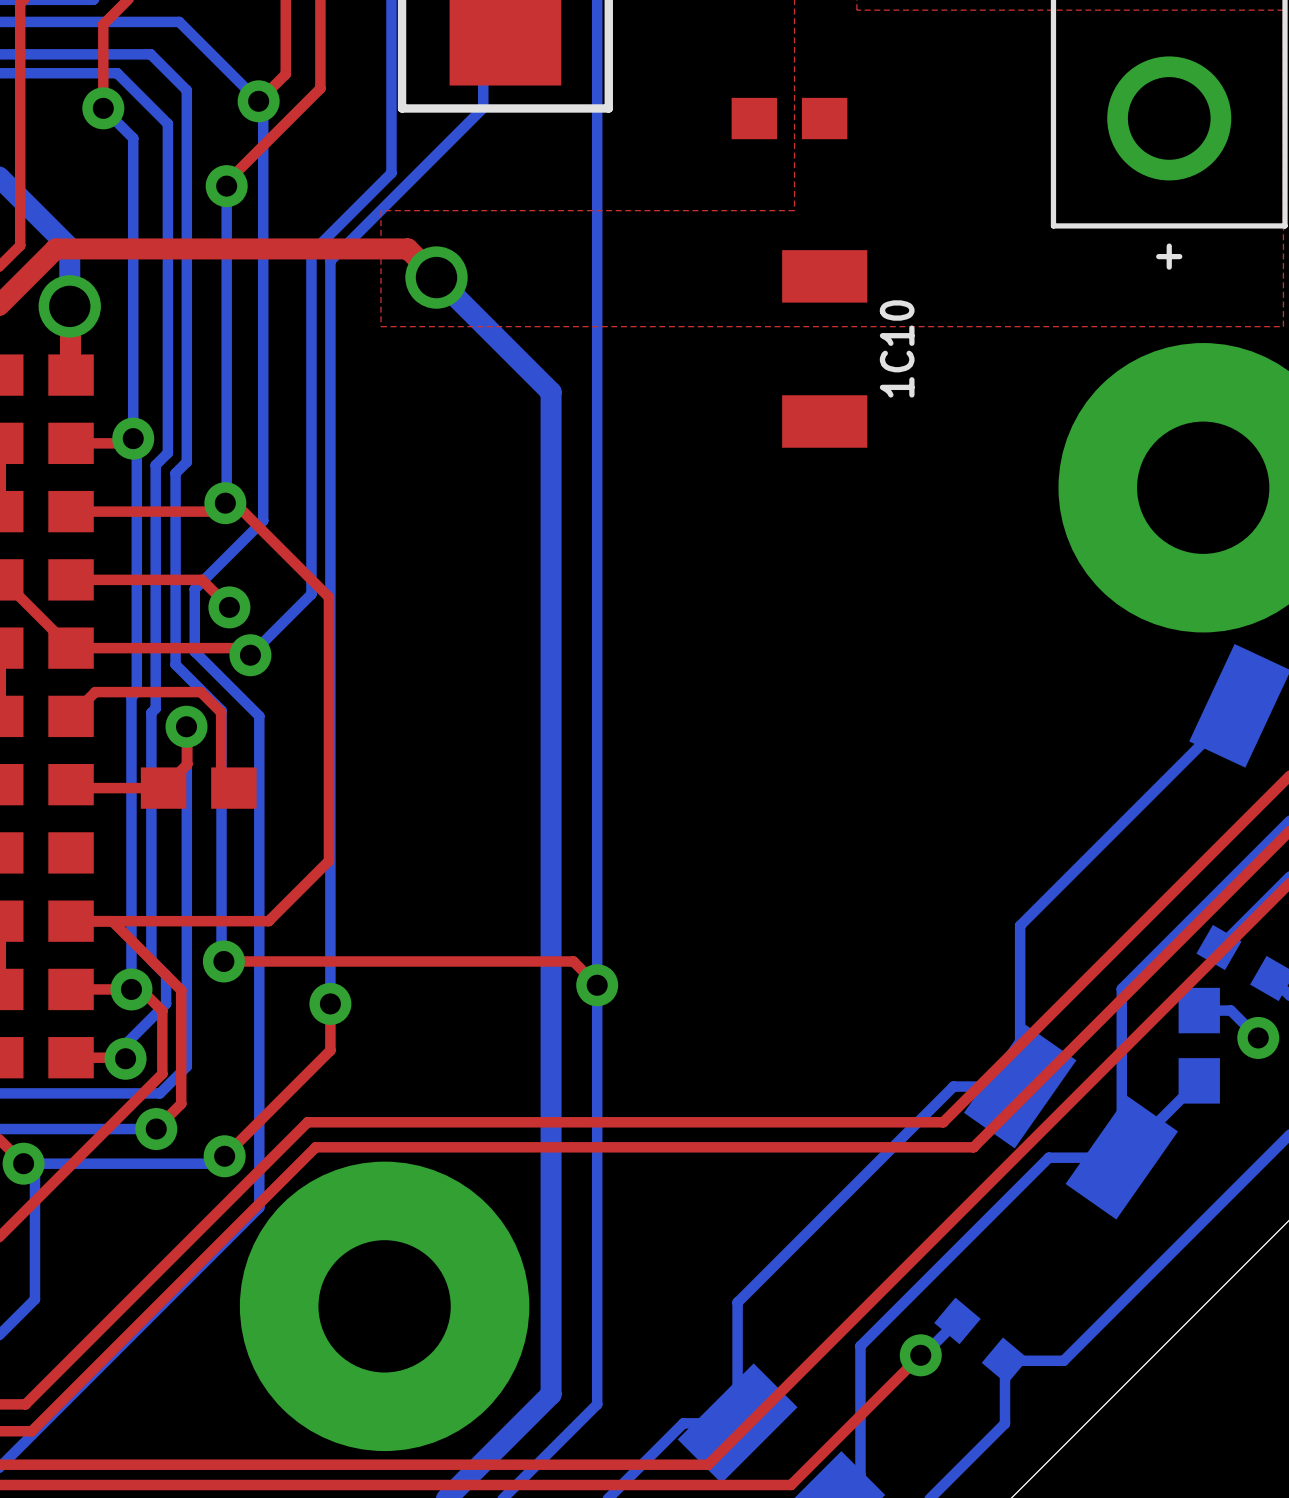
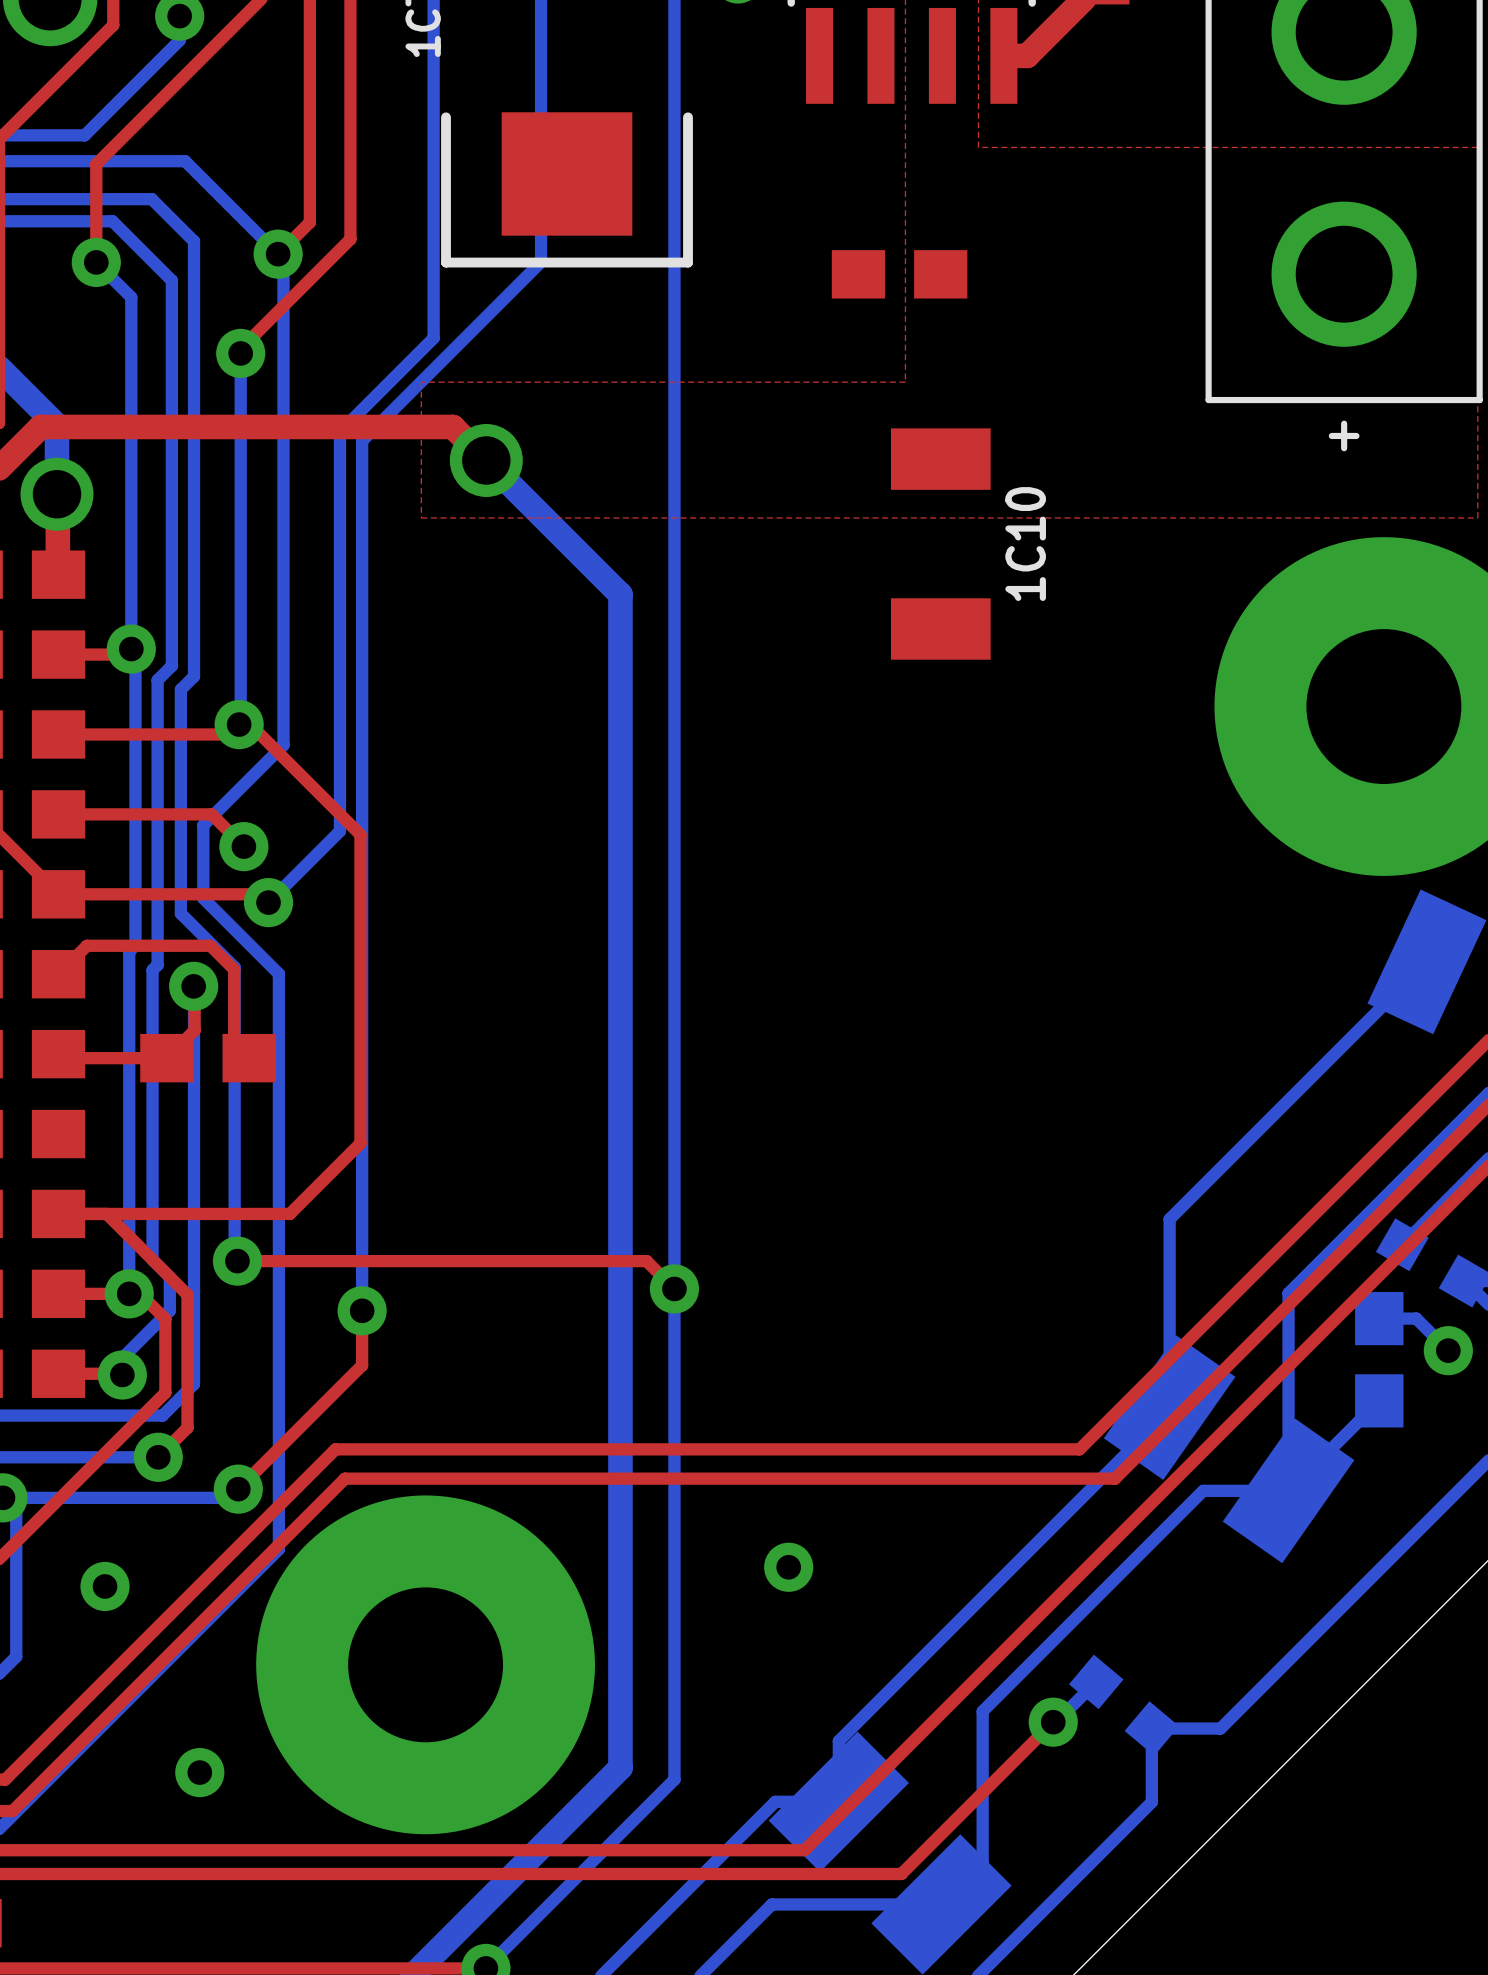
bottom track: (1020, 1086) (953, 1086) (737, 1302) (737, 1371) -> (1169, 1407) (1169, 1410) (838, 1741)
via: none -> (788, 1567)
via: none -> (105, 1586)
via: none -> (199, 1772)

